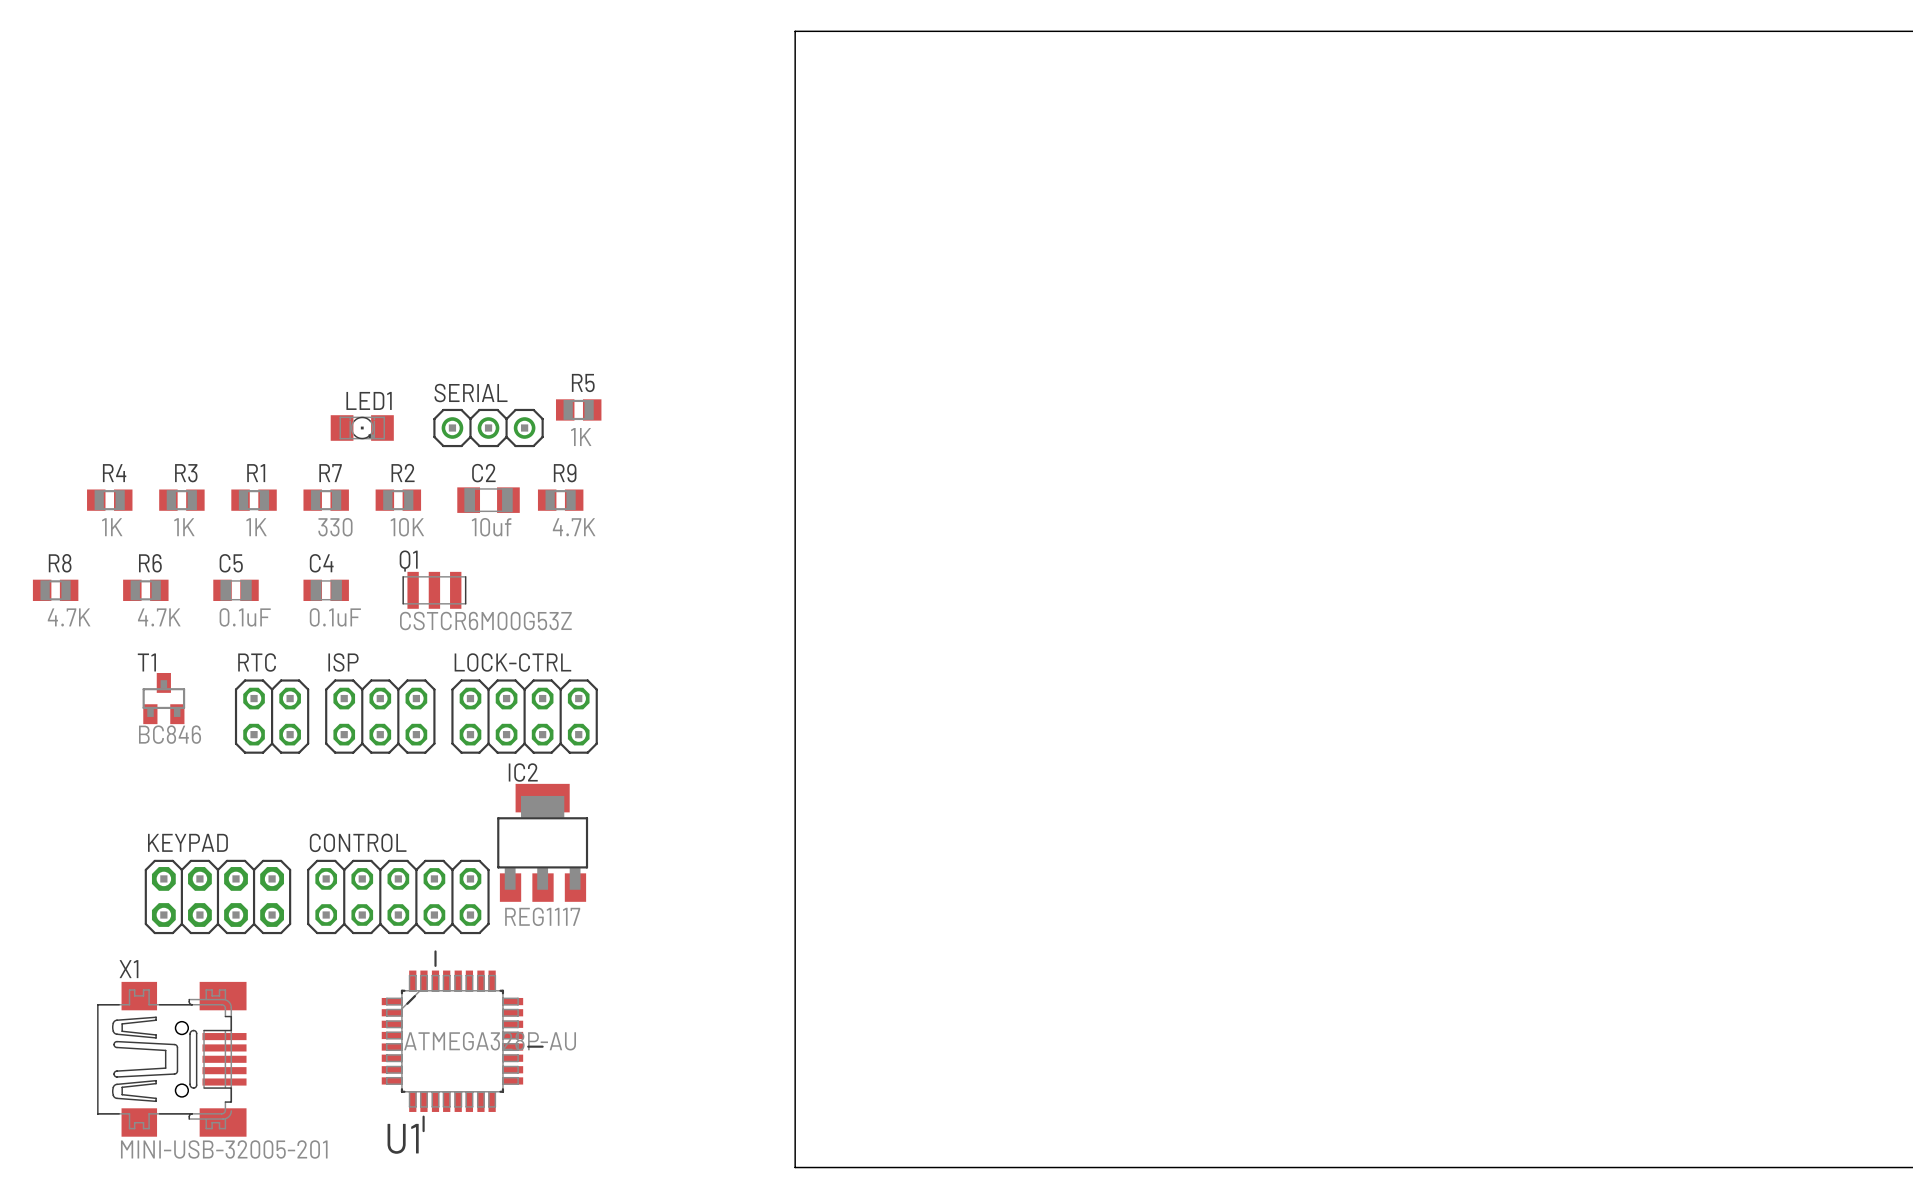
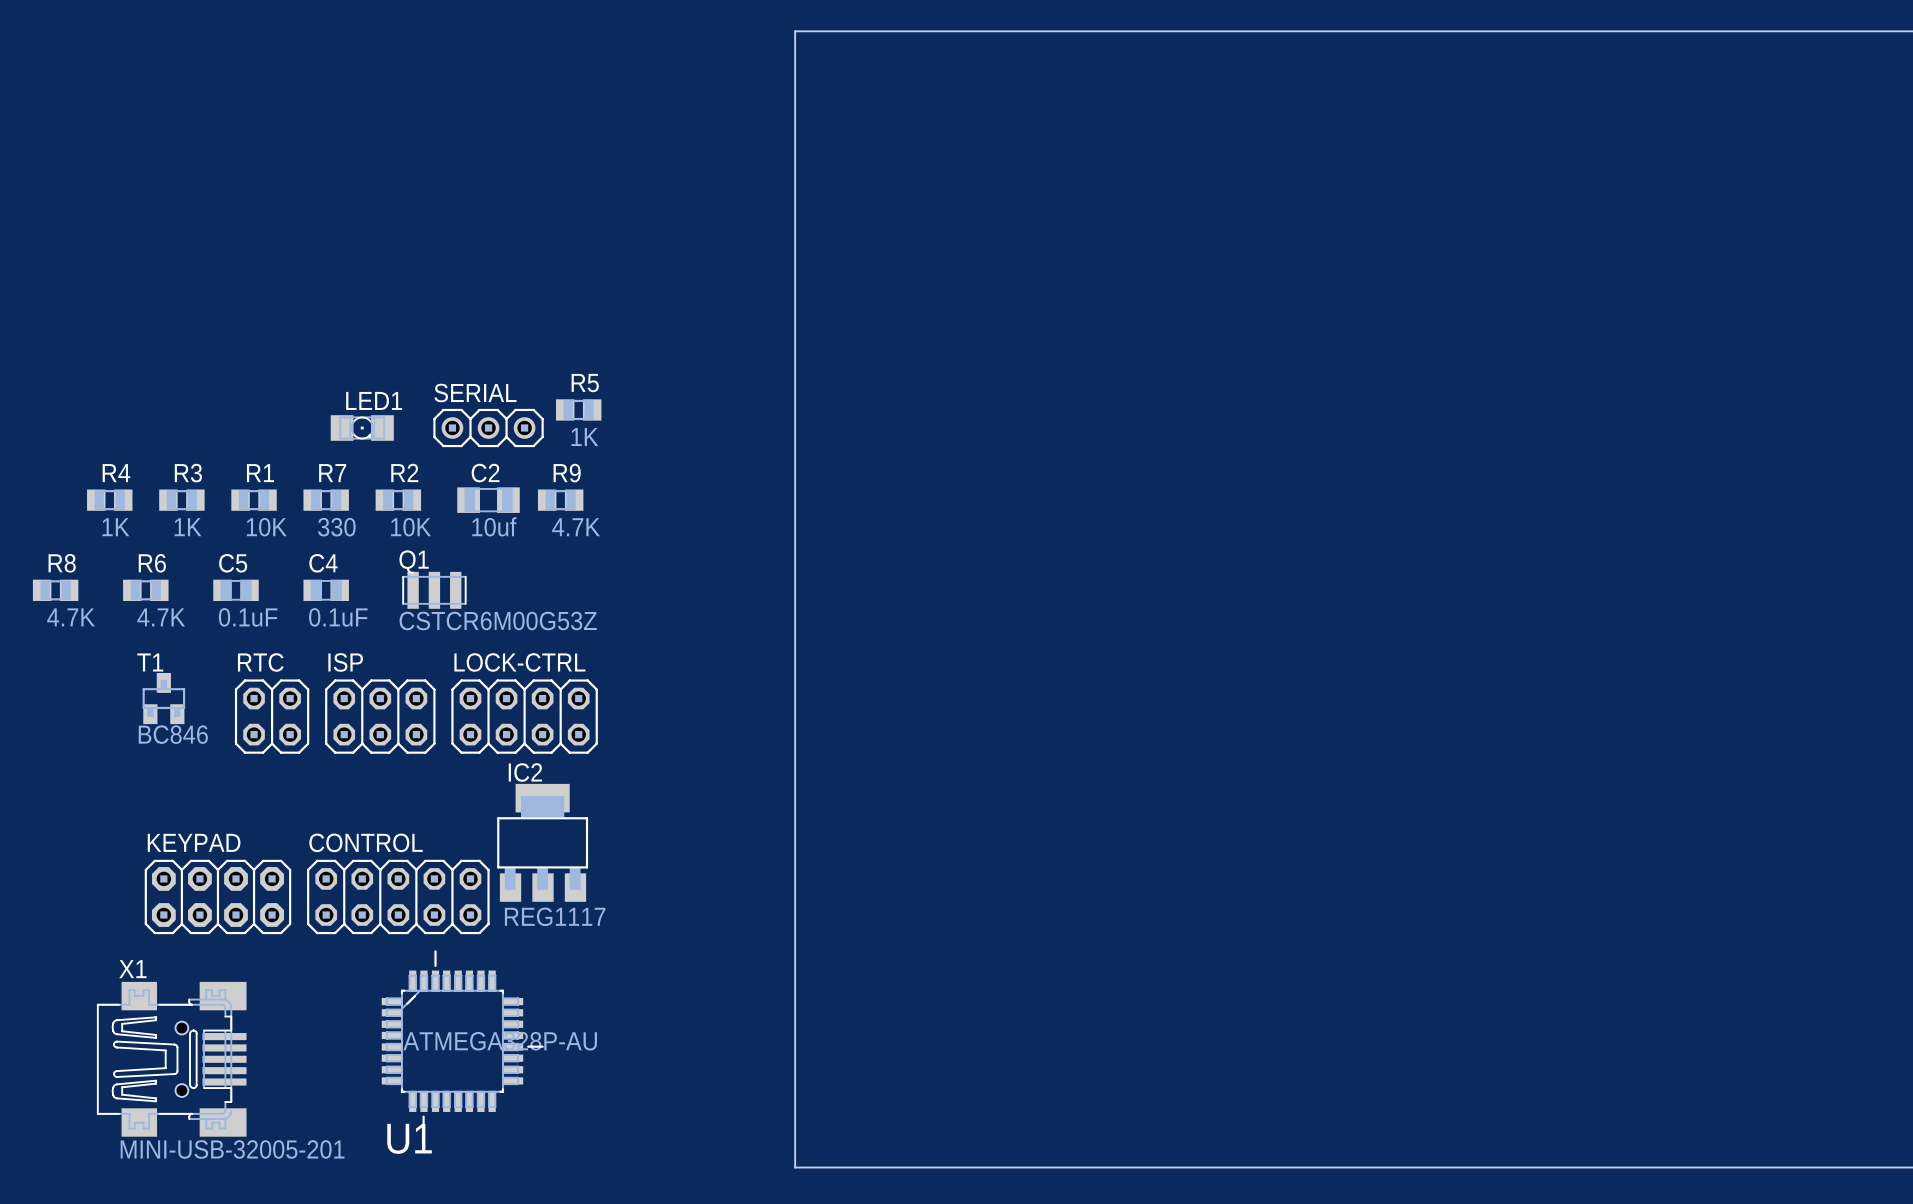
R1 value: 1K (256, 527) -> 10K (266, 527)

